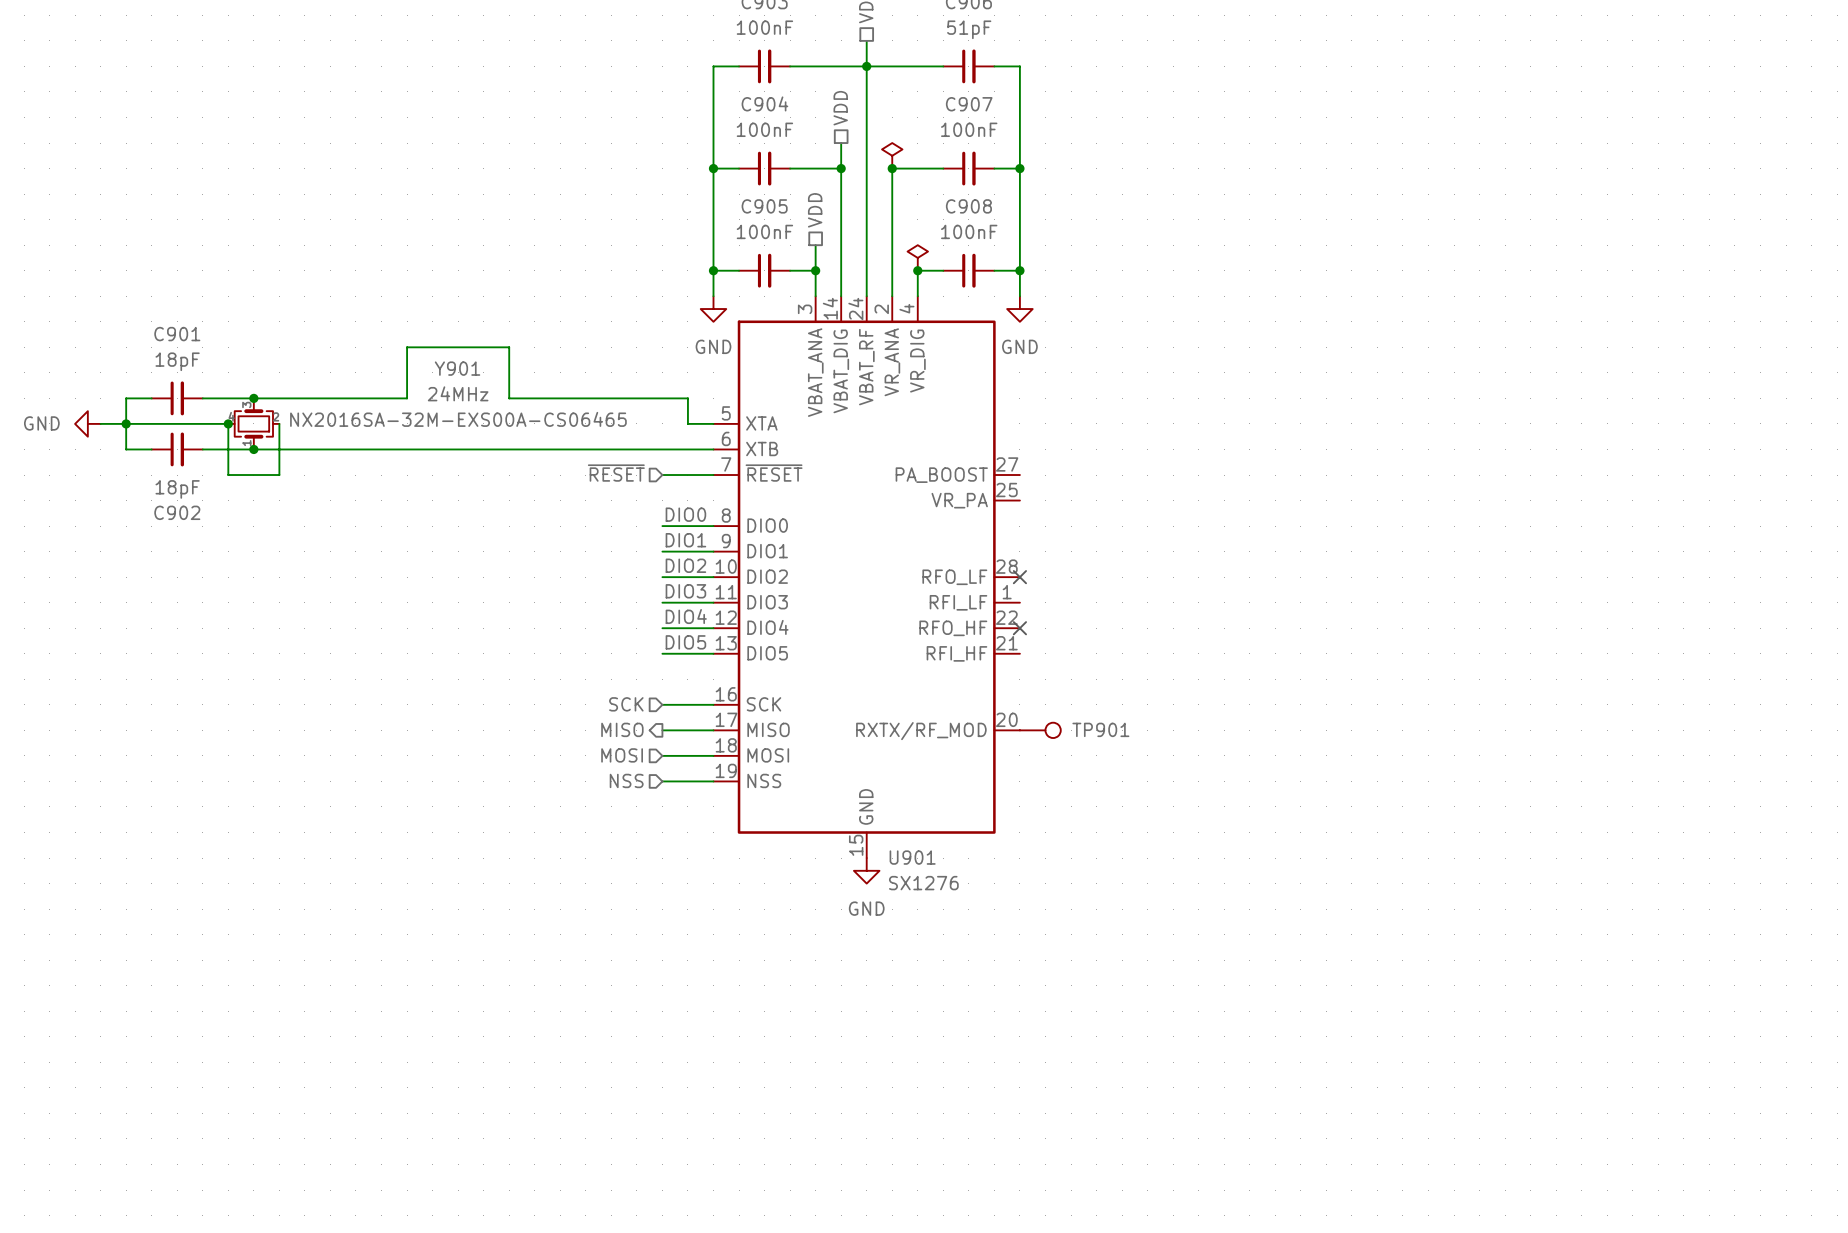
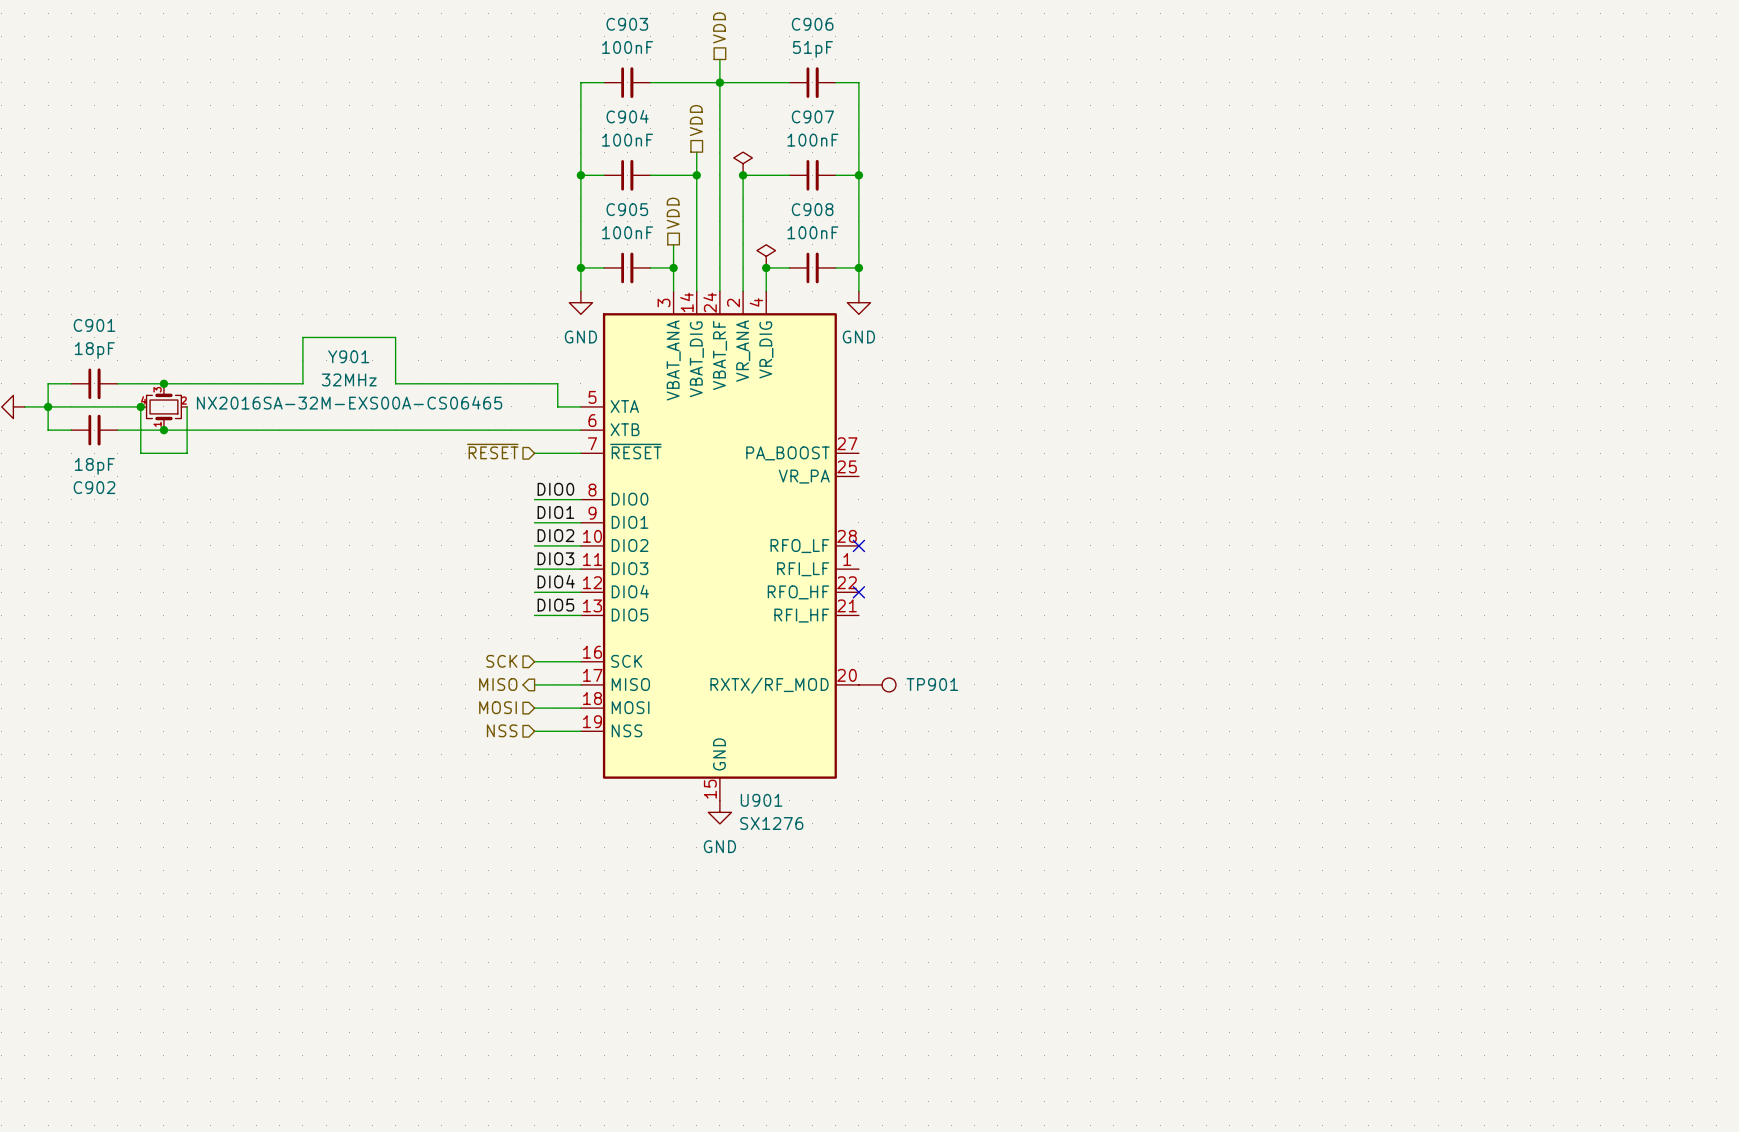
Y901 value: 24MHz (458, 393) -> 32MHz (349, 379)

